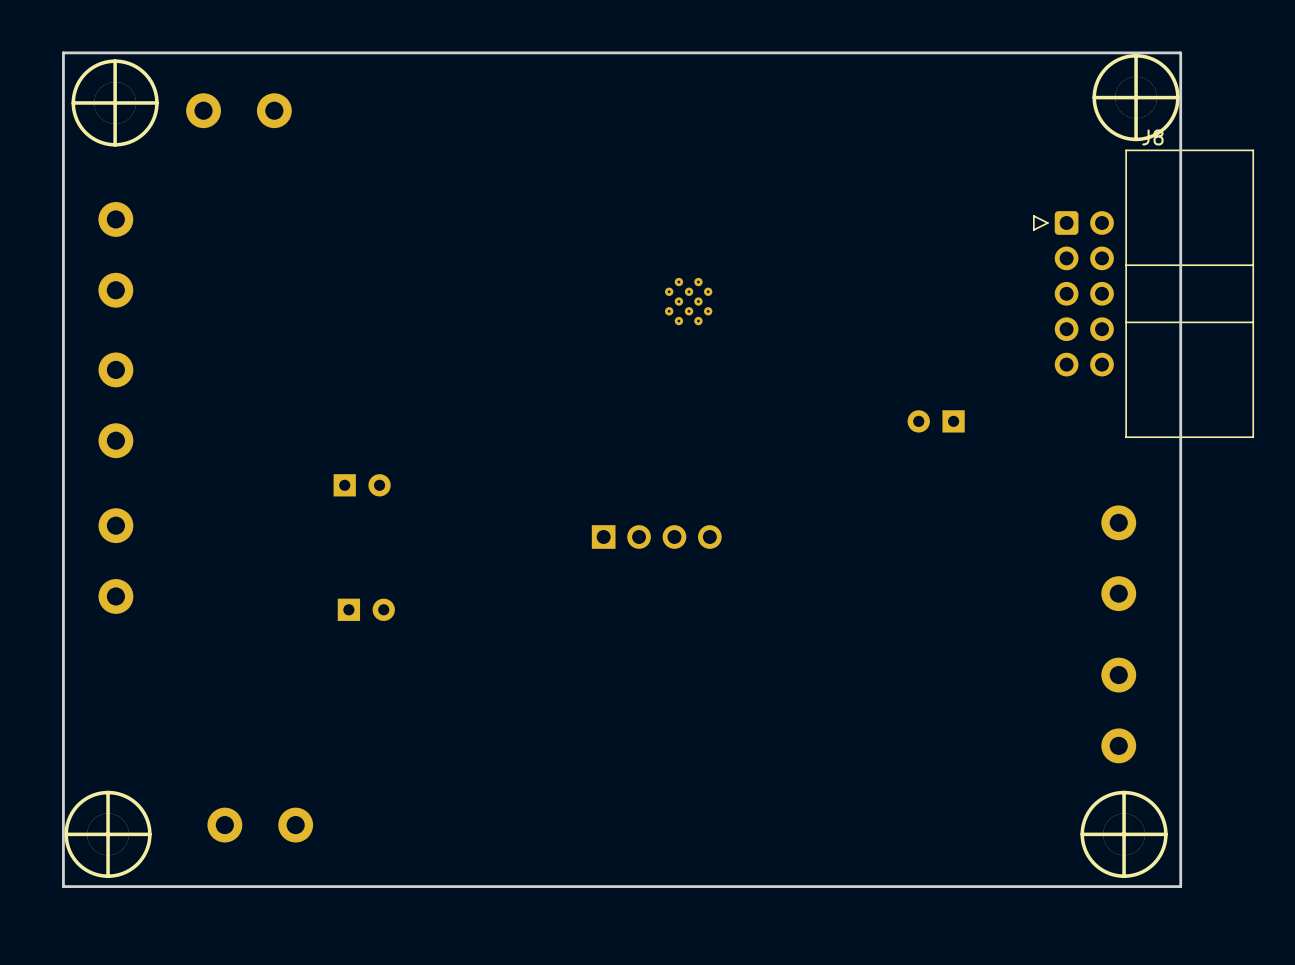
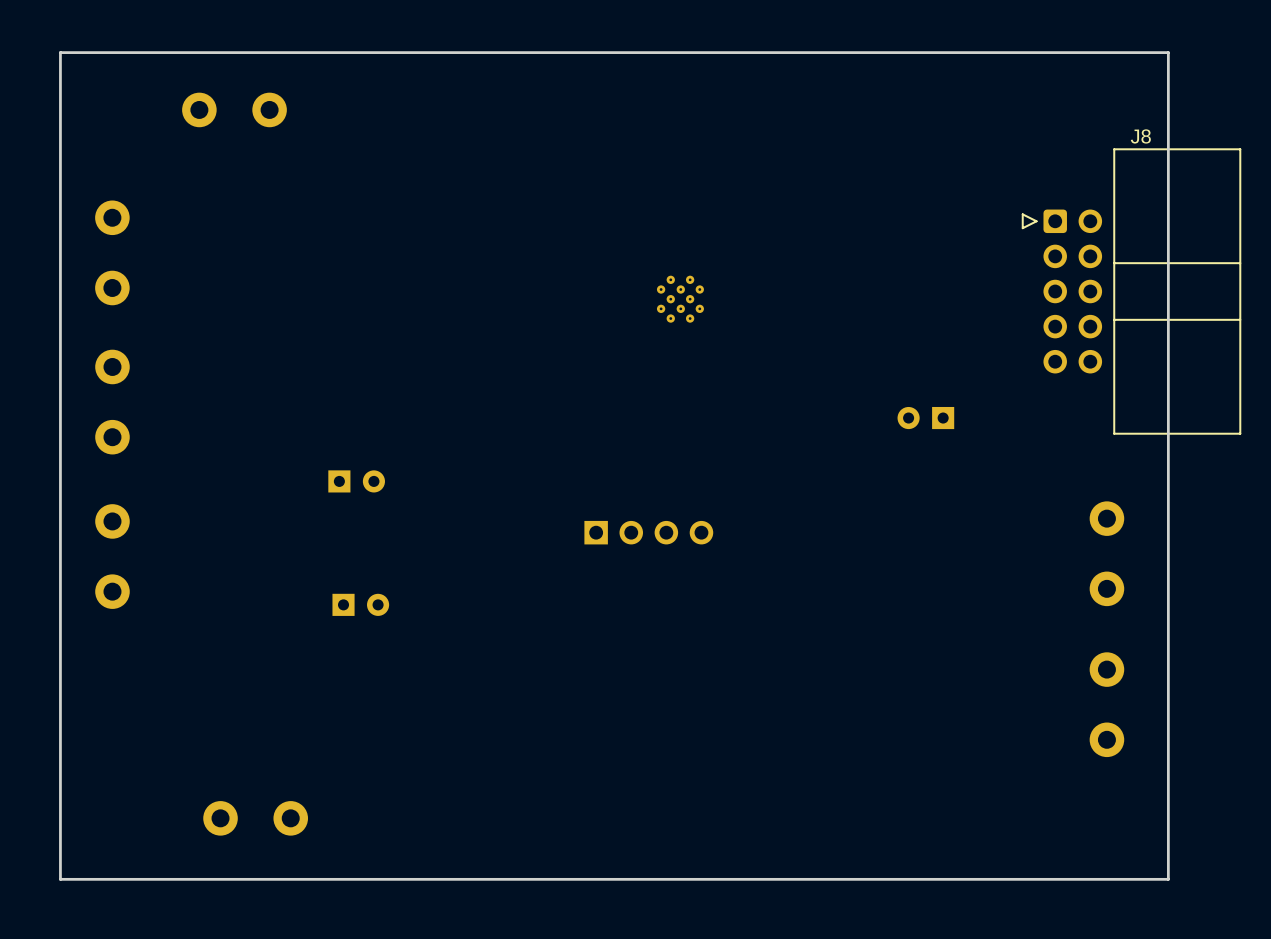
part: (1136, 97) -> none
part: (115, 102) -> none
part: (108, 834) -> none
part: (1124, 834) -> none

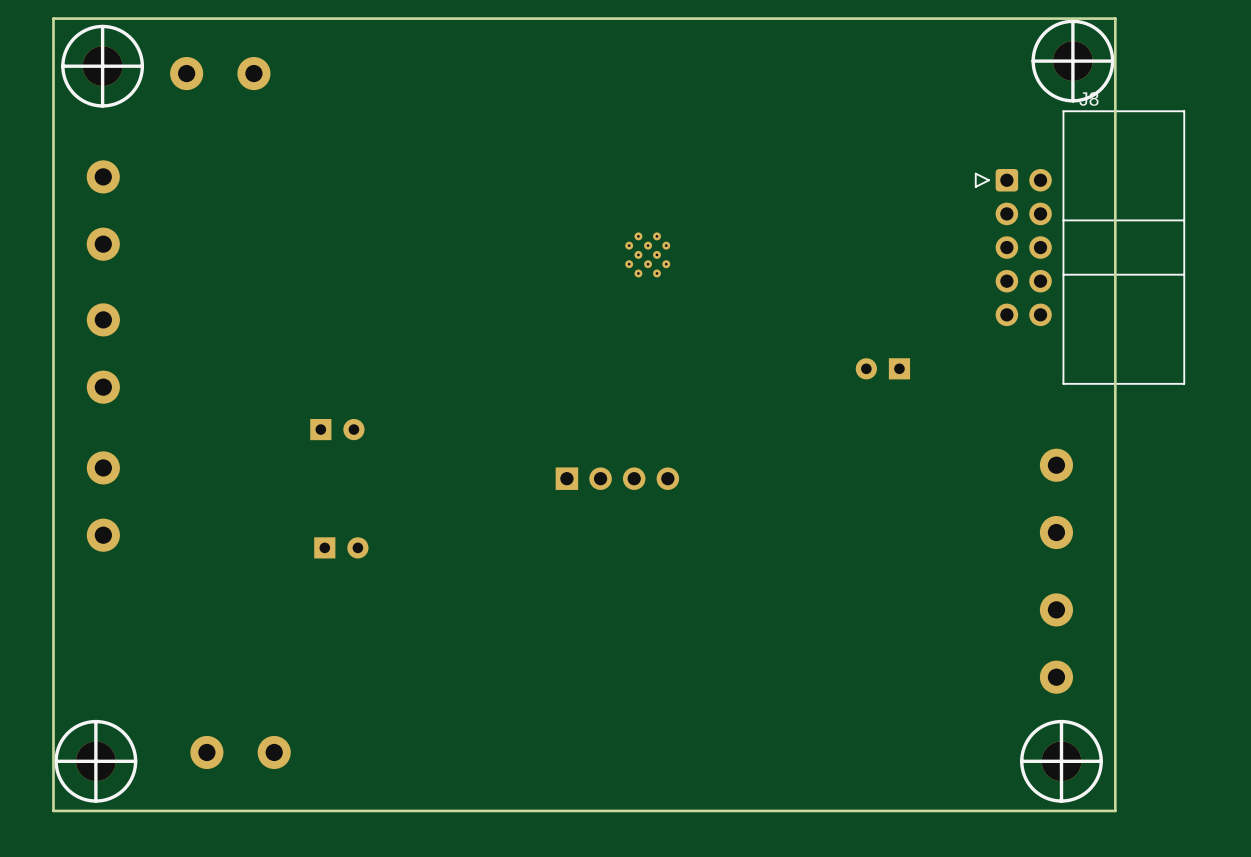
part: none -> (1072, 61)
part: none -> (102, 66)
part: none -> (95, 761)
part: none -> (1061, 761)

